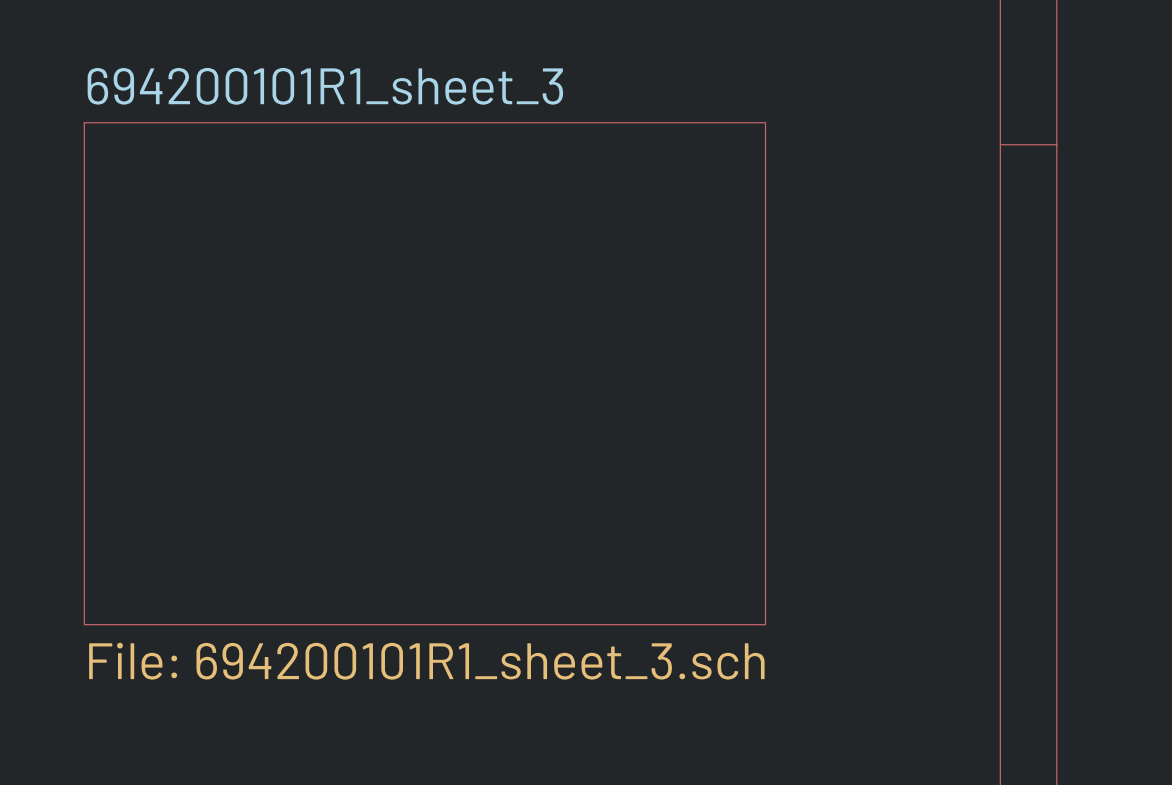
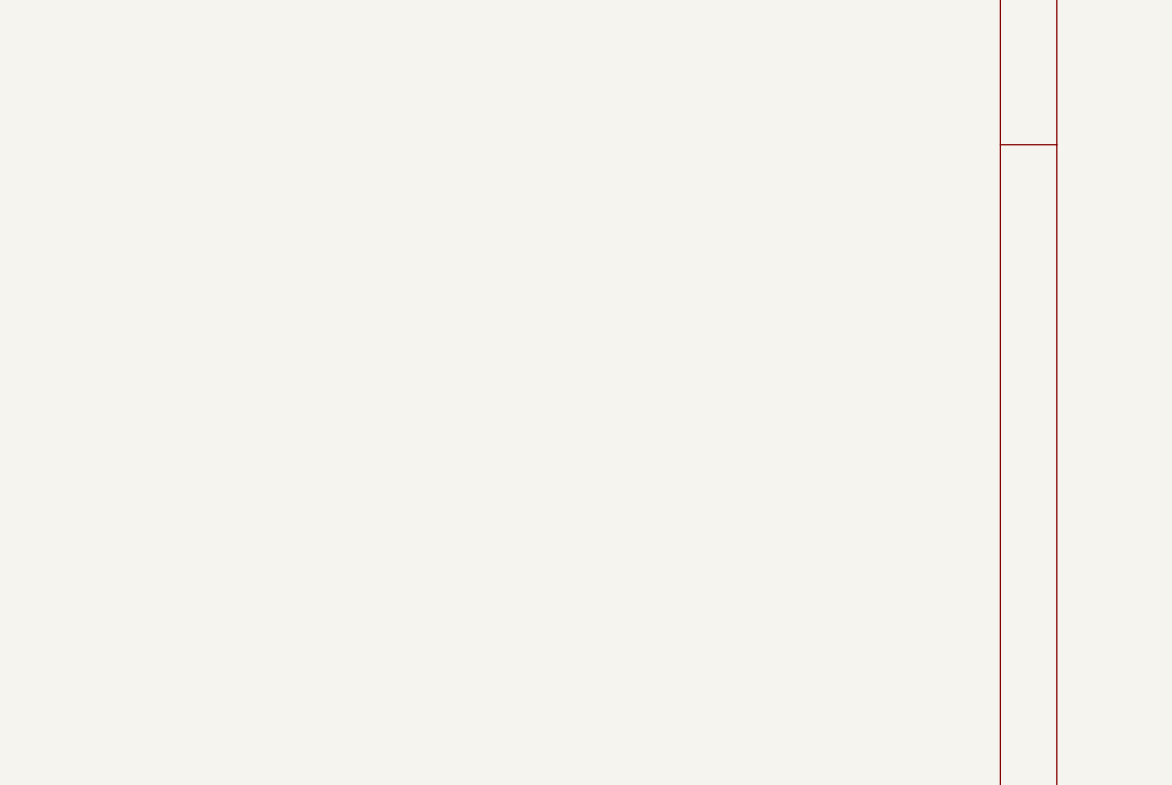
sheet 694200101R1_sheet_3: File: 694200101R1_sheet_3.sch (424, 373) -> none

